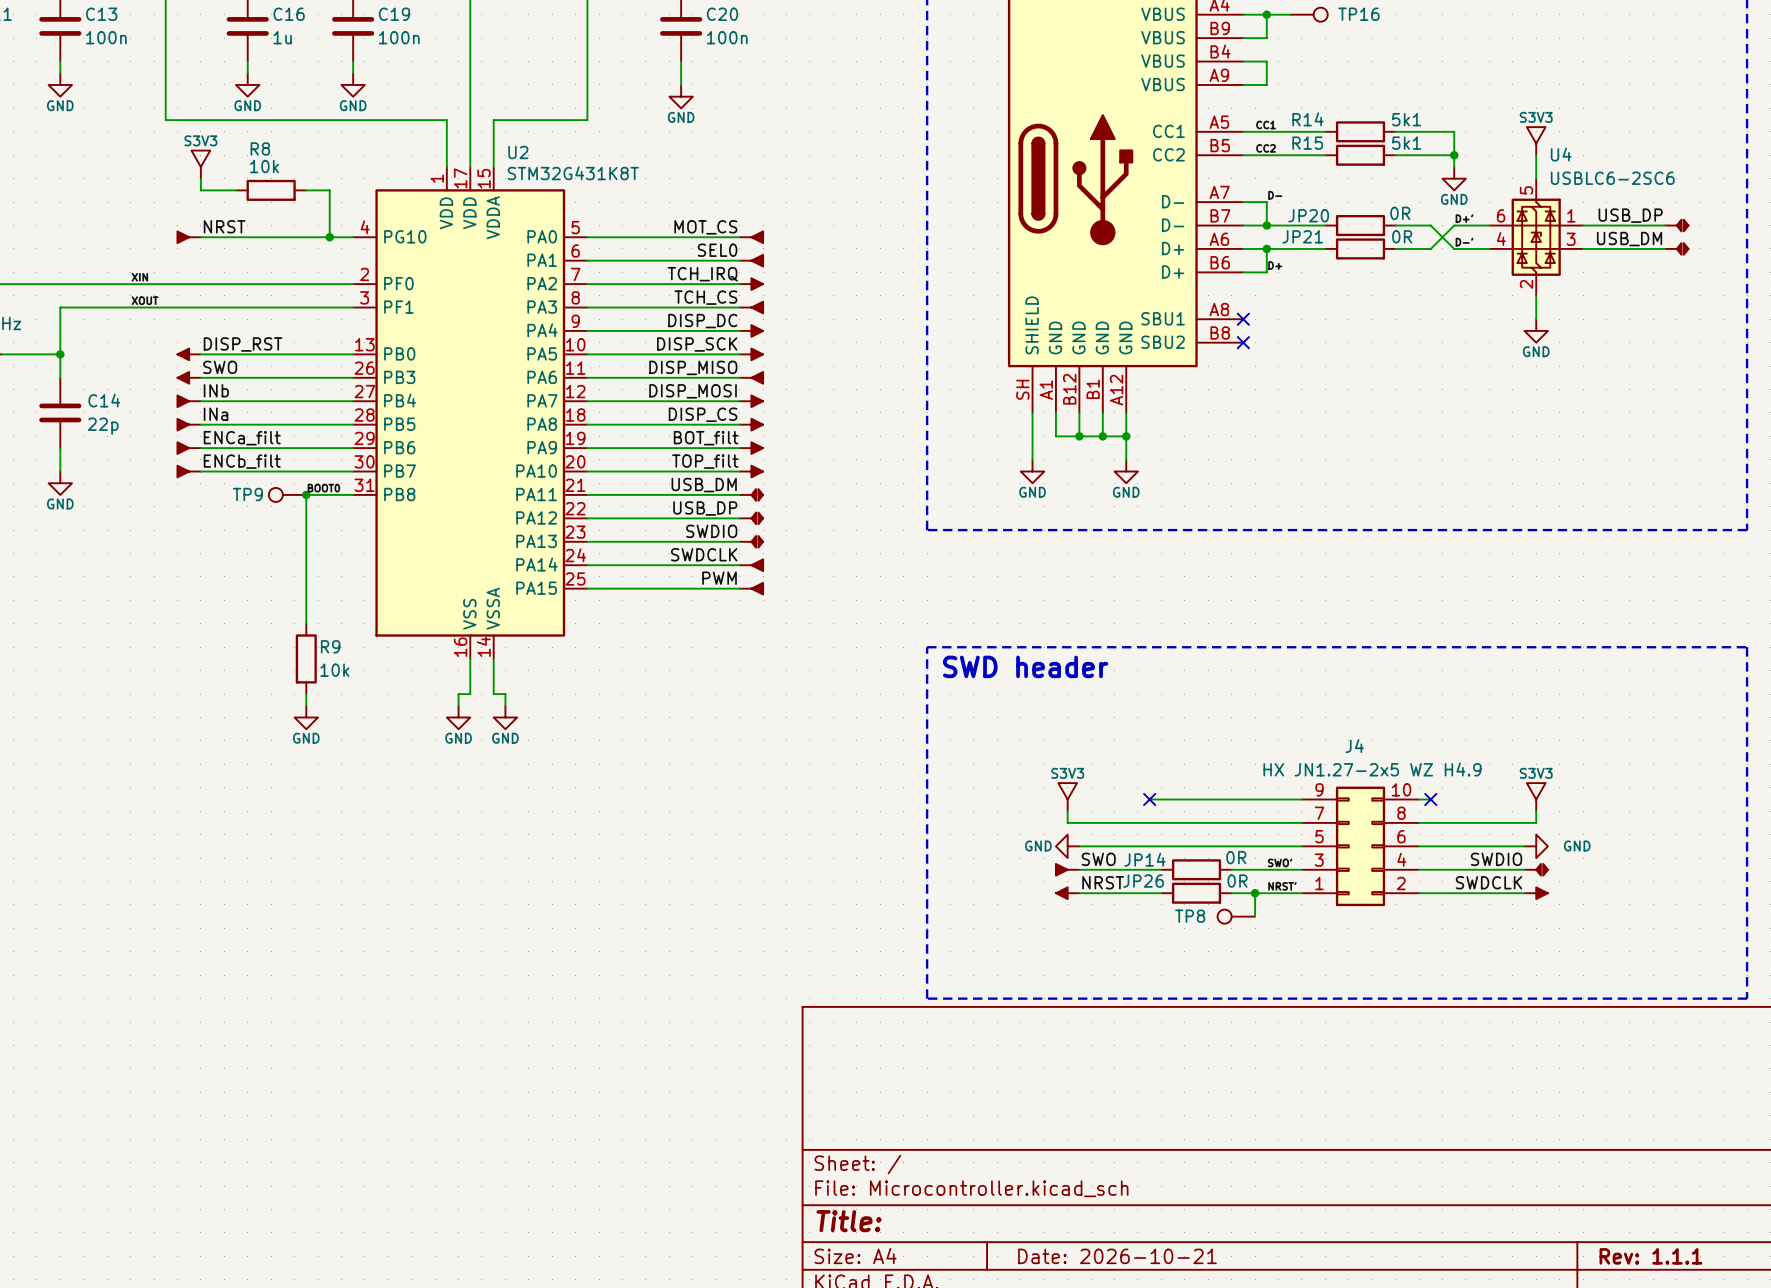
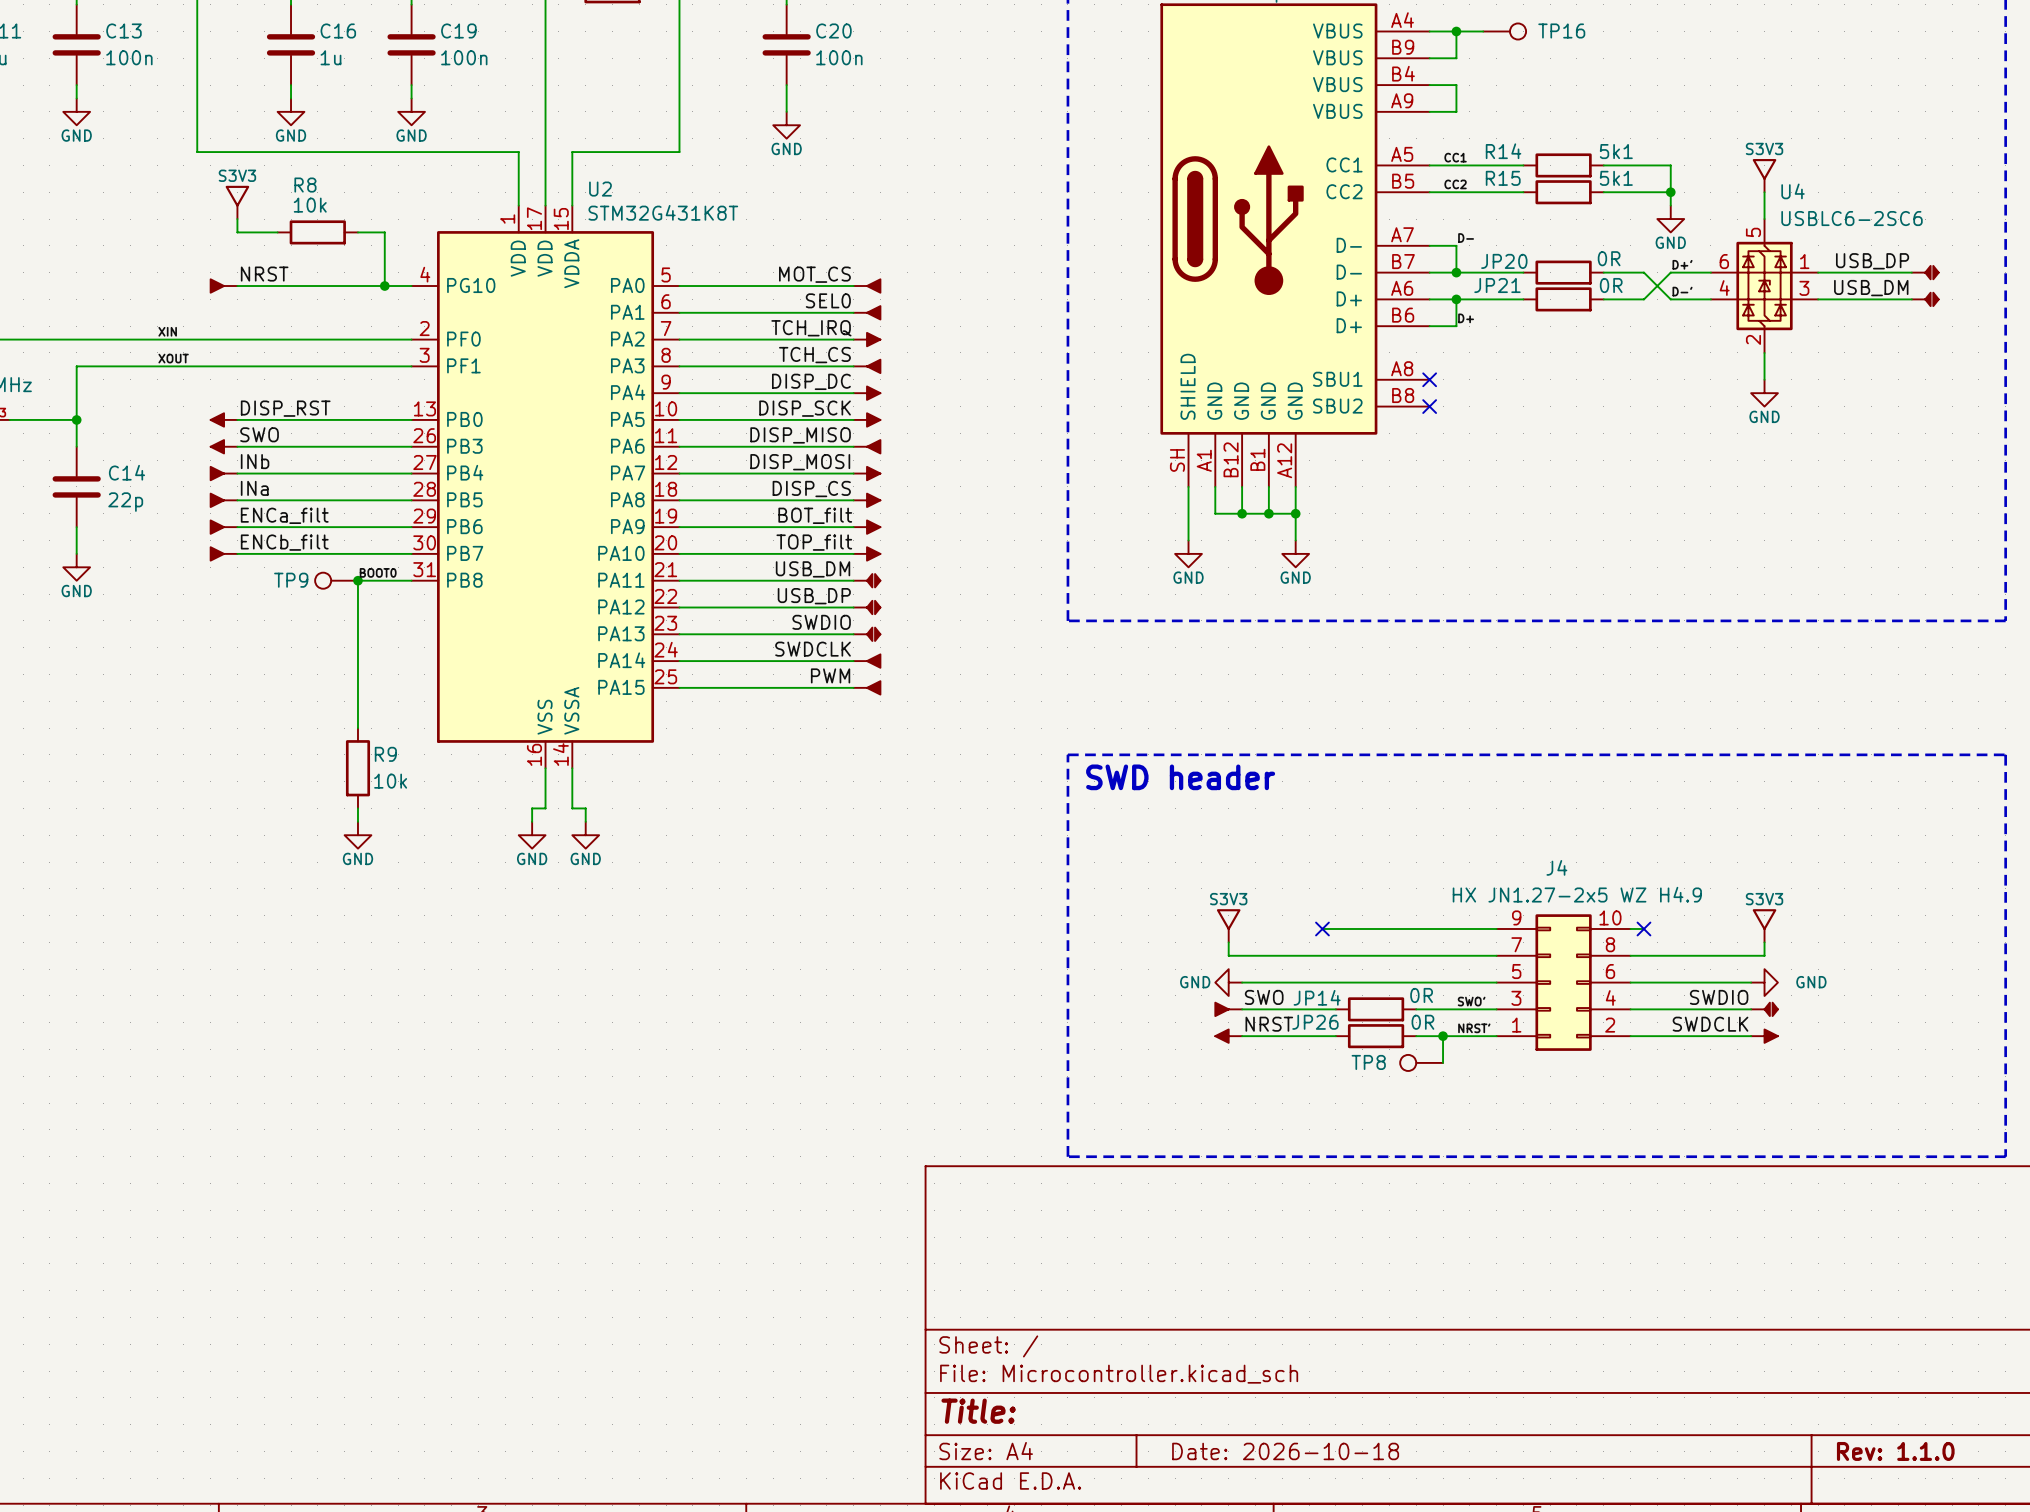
title block: Date: 2026-10-21 (1117, 1256) -> Date: 2026-10-18 (1285, 1451)
title block: Rev: 1.1.1 (1650, 1256) -> Rev: 1.1.0 (1895, 1451)

